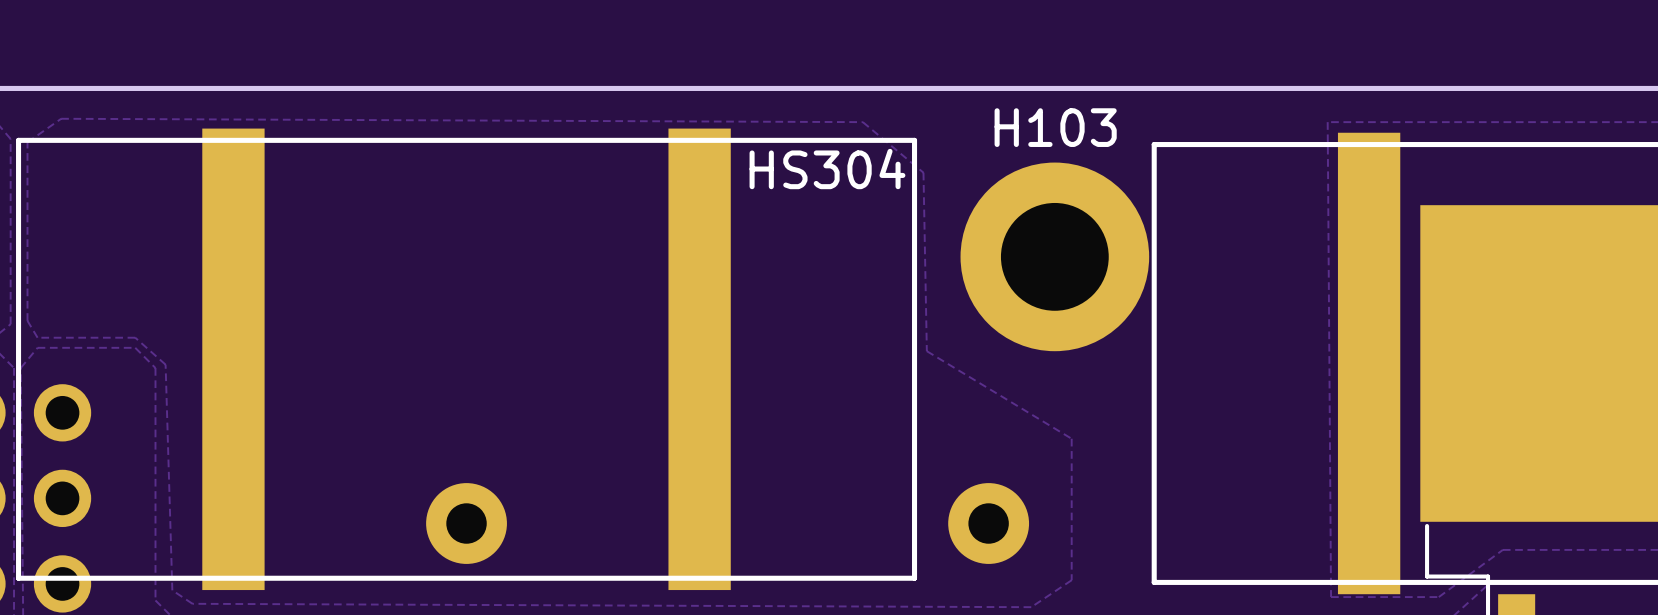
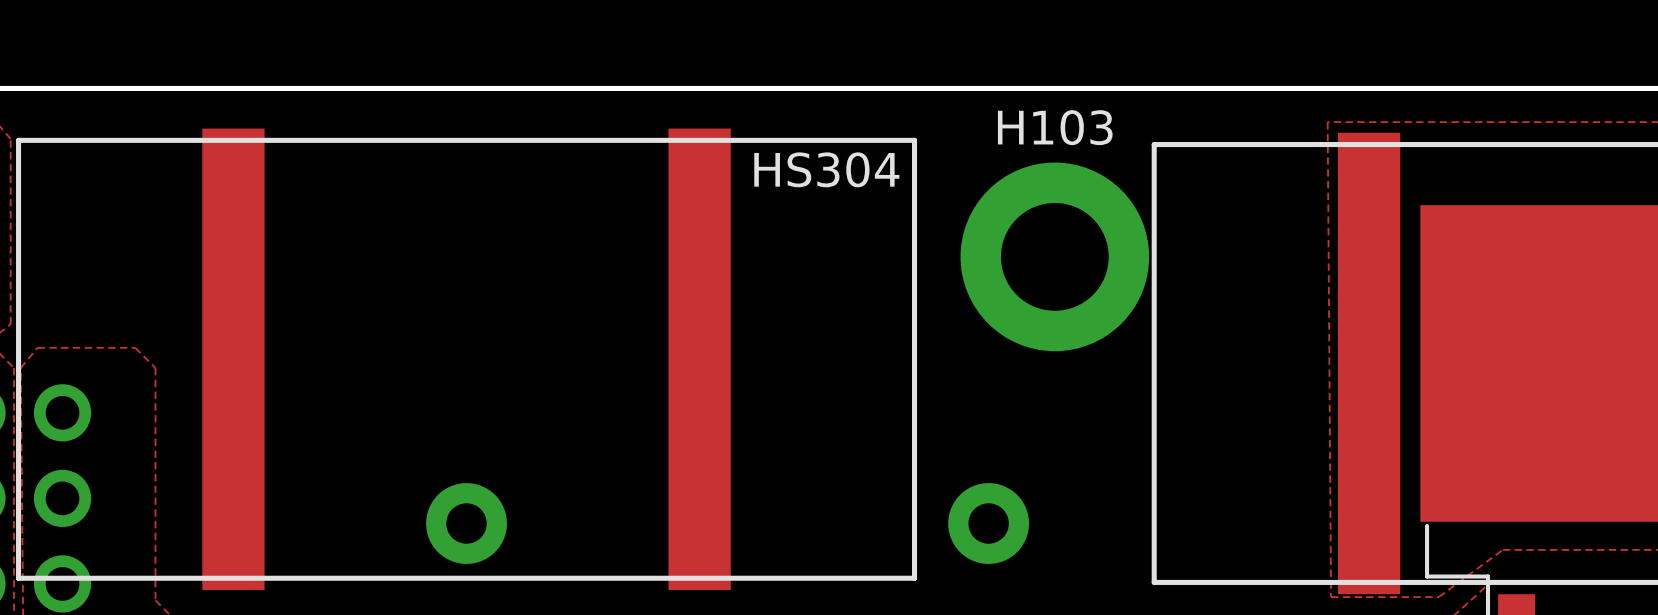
zone outline: (61, 118) (27, 142) (27, 320) (37, 337) (135, 337) (165, 364) (172, 590) (192, 603) (1031, 607) (1071, 580) (1071, 438) (926, 351) (923, 172) (862, 122) (61, 118) -> none

